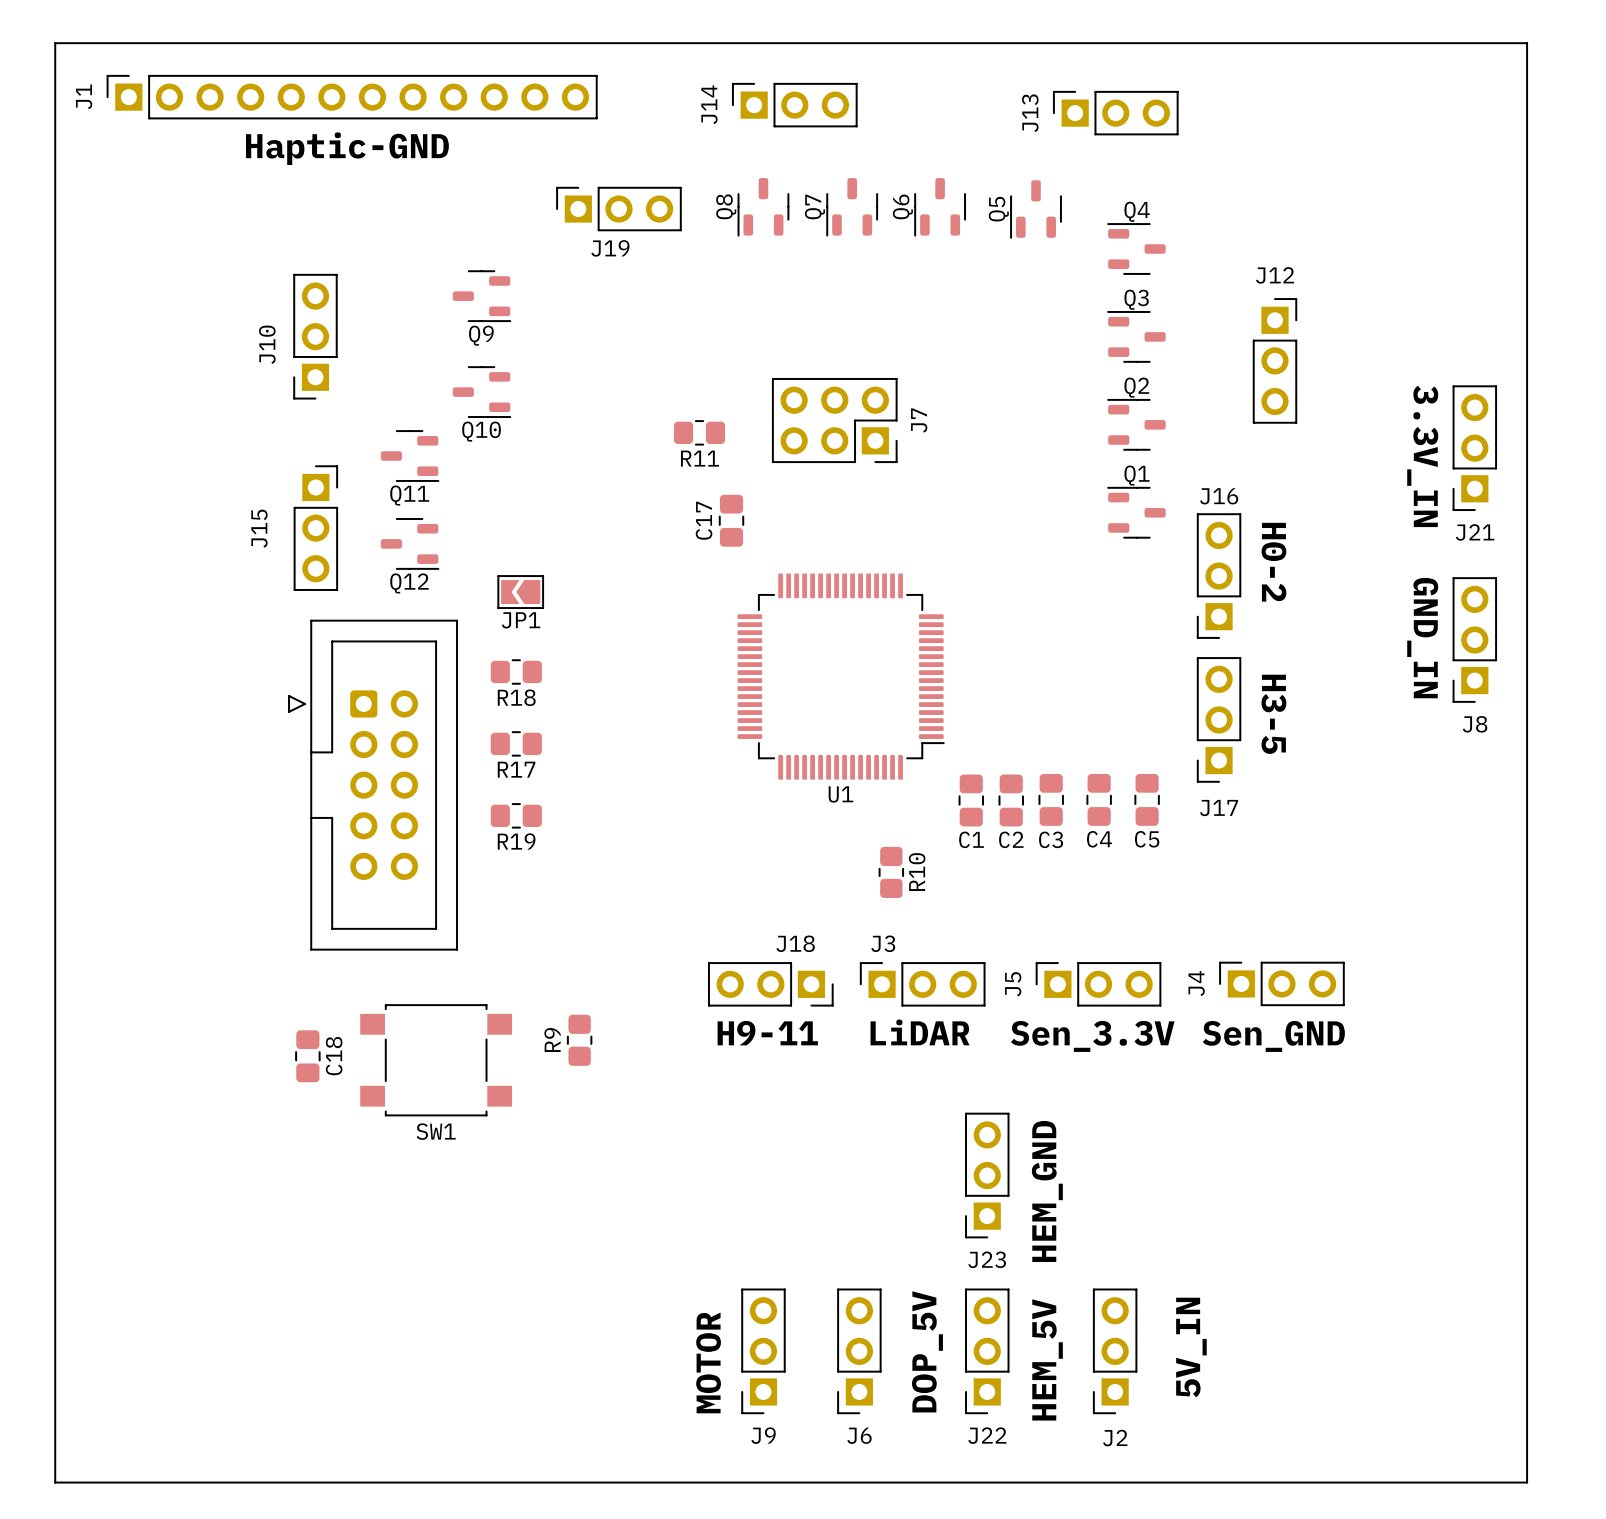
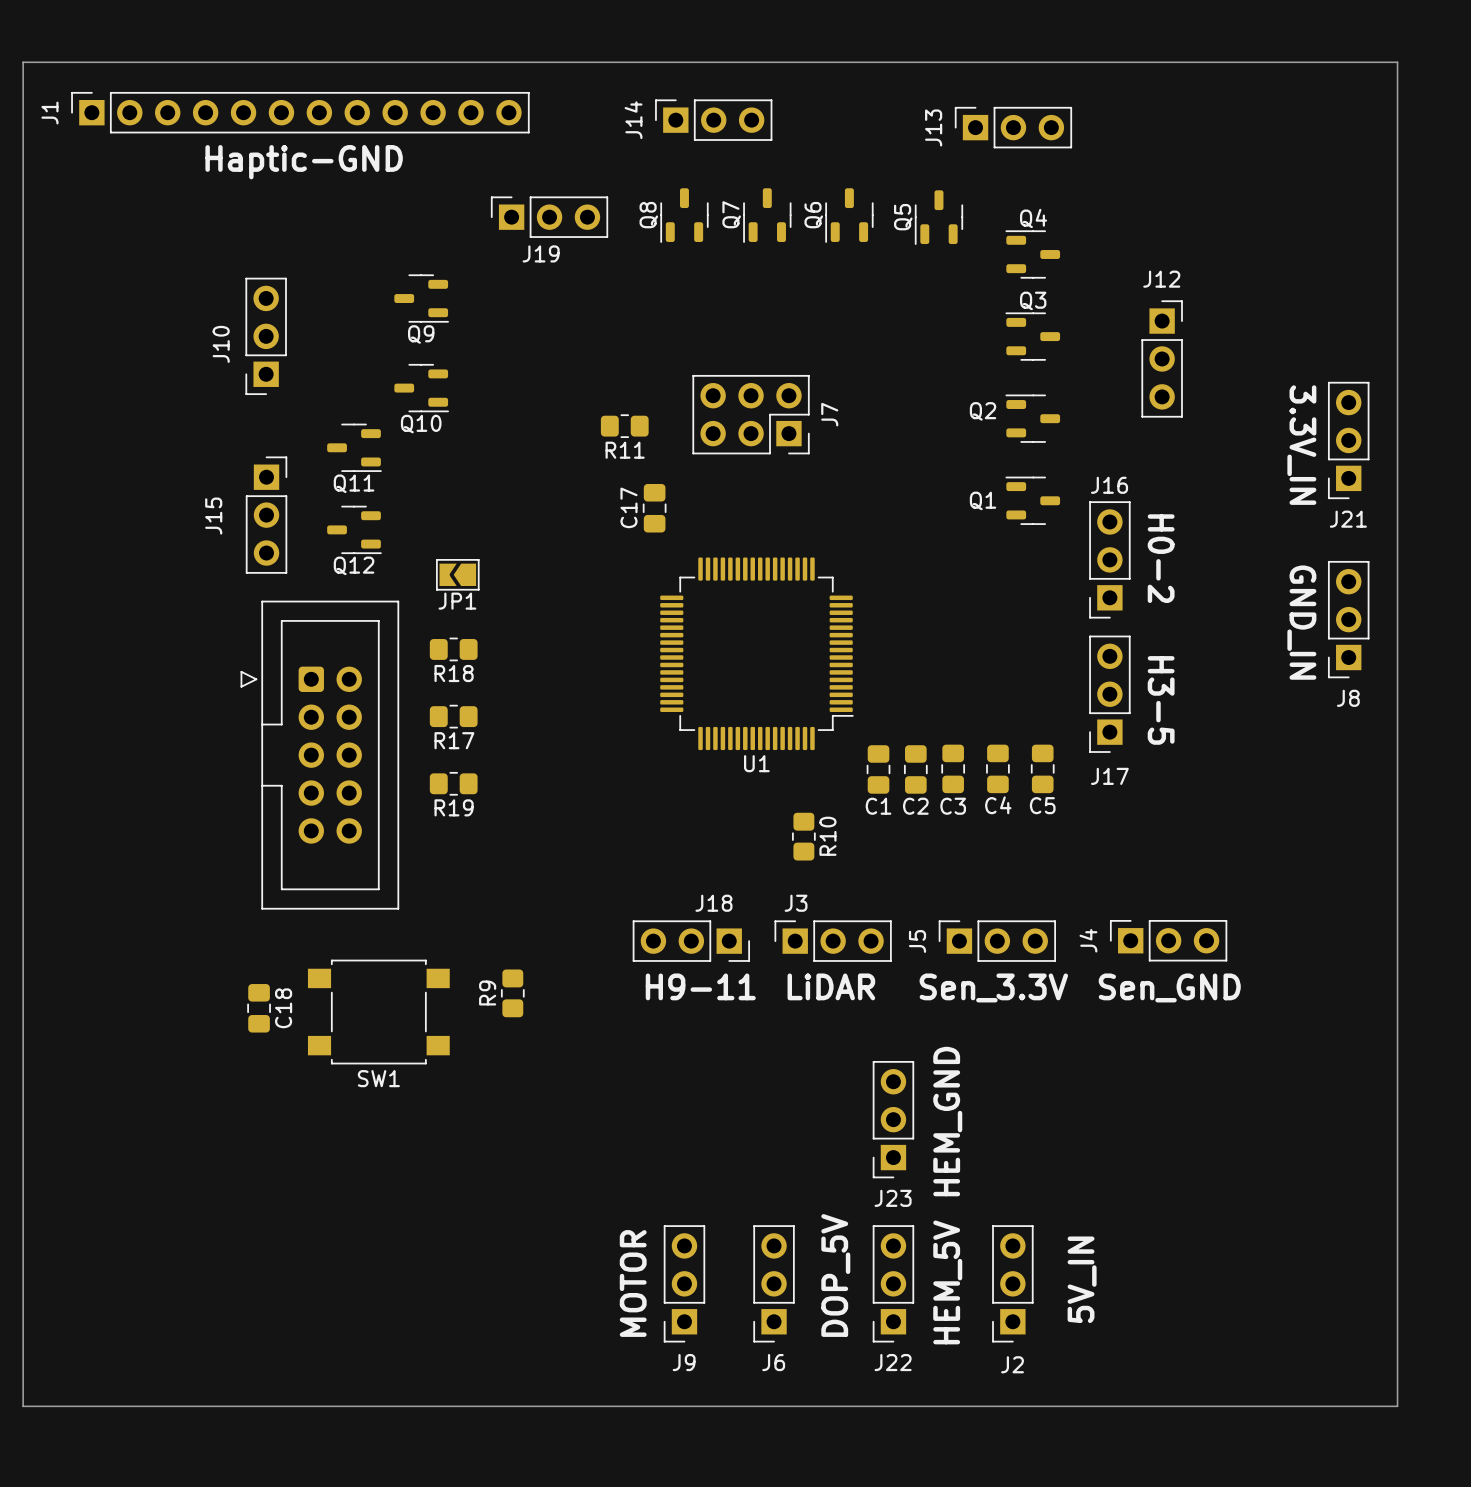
Q2 name position: Q2 (1136, 387) -> Q2 (983, 411)
Q1 name position: Q1 (1137, 475) -> Q1 (983, 500)

